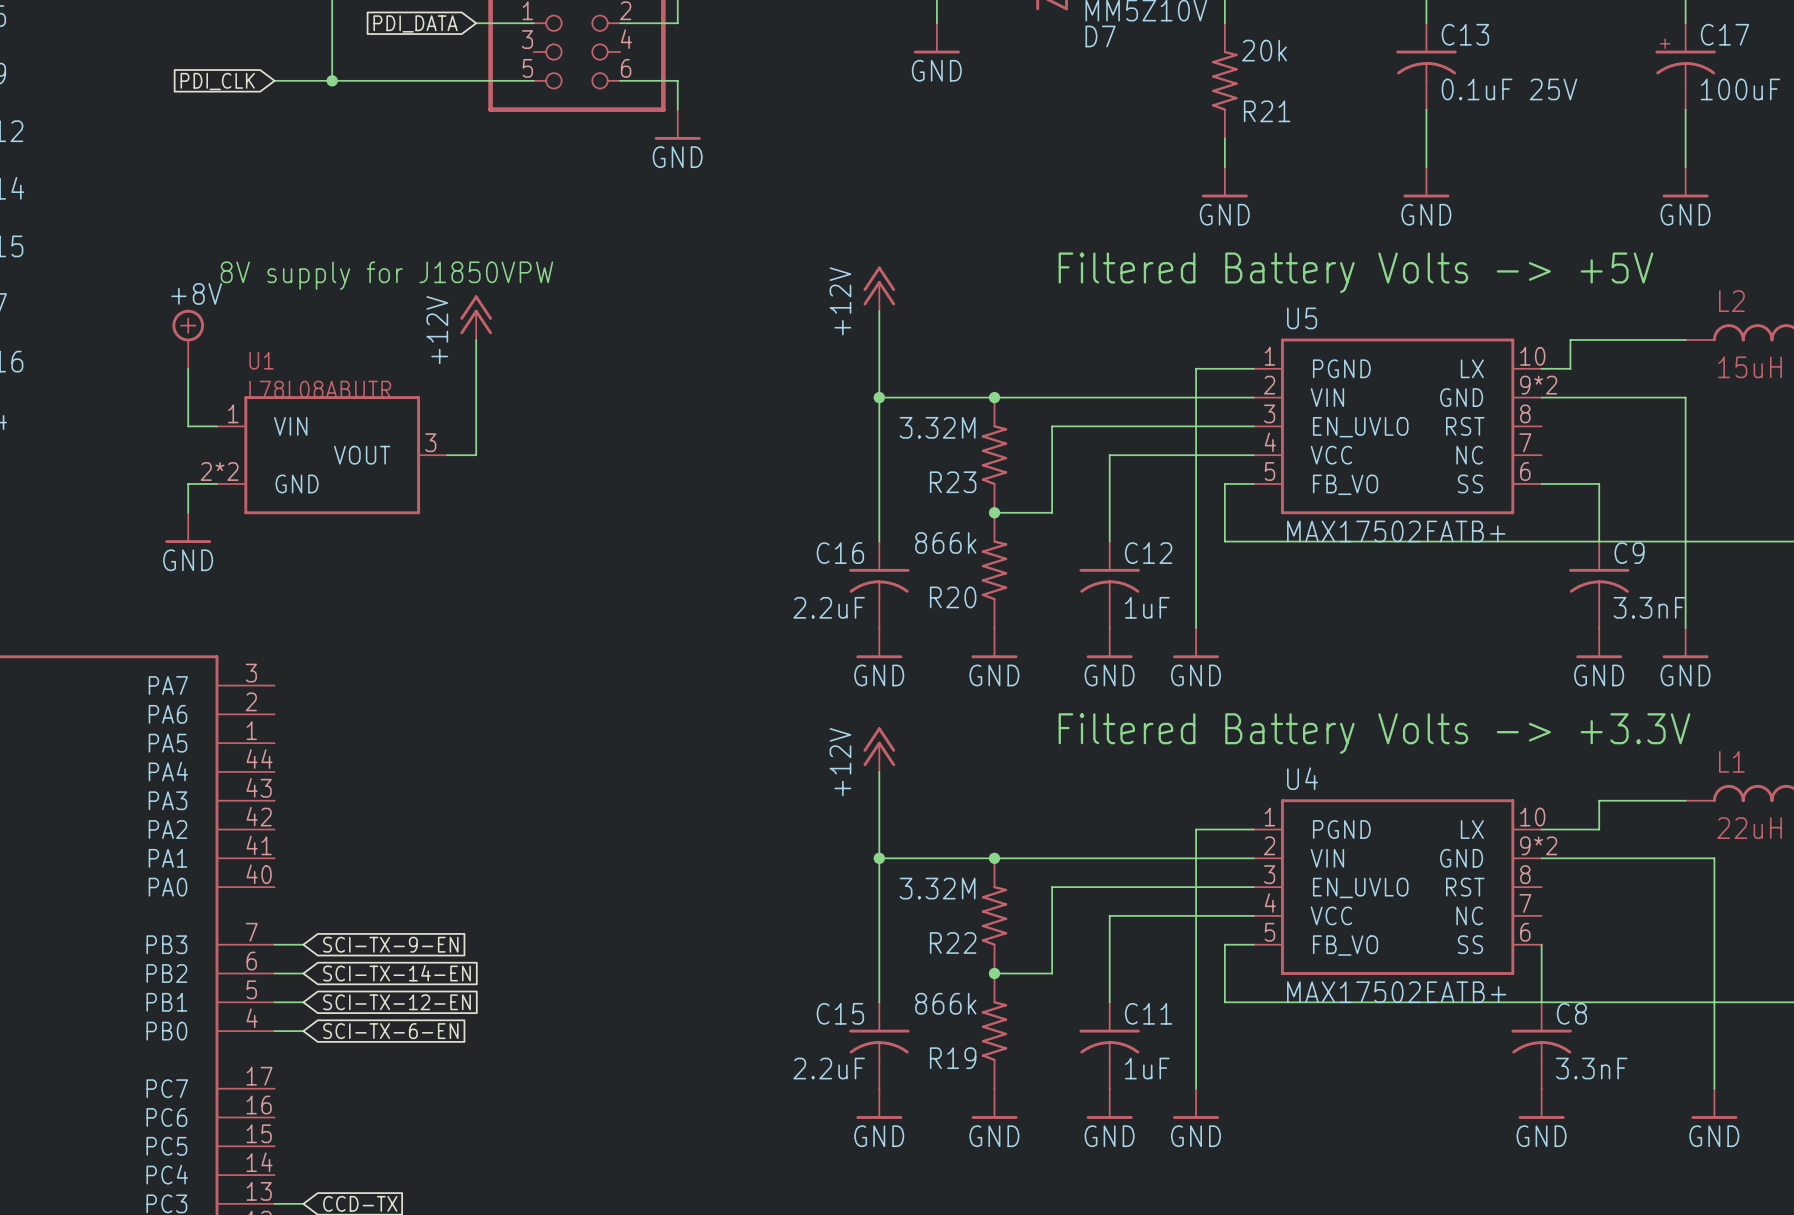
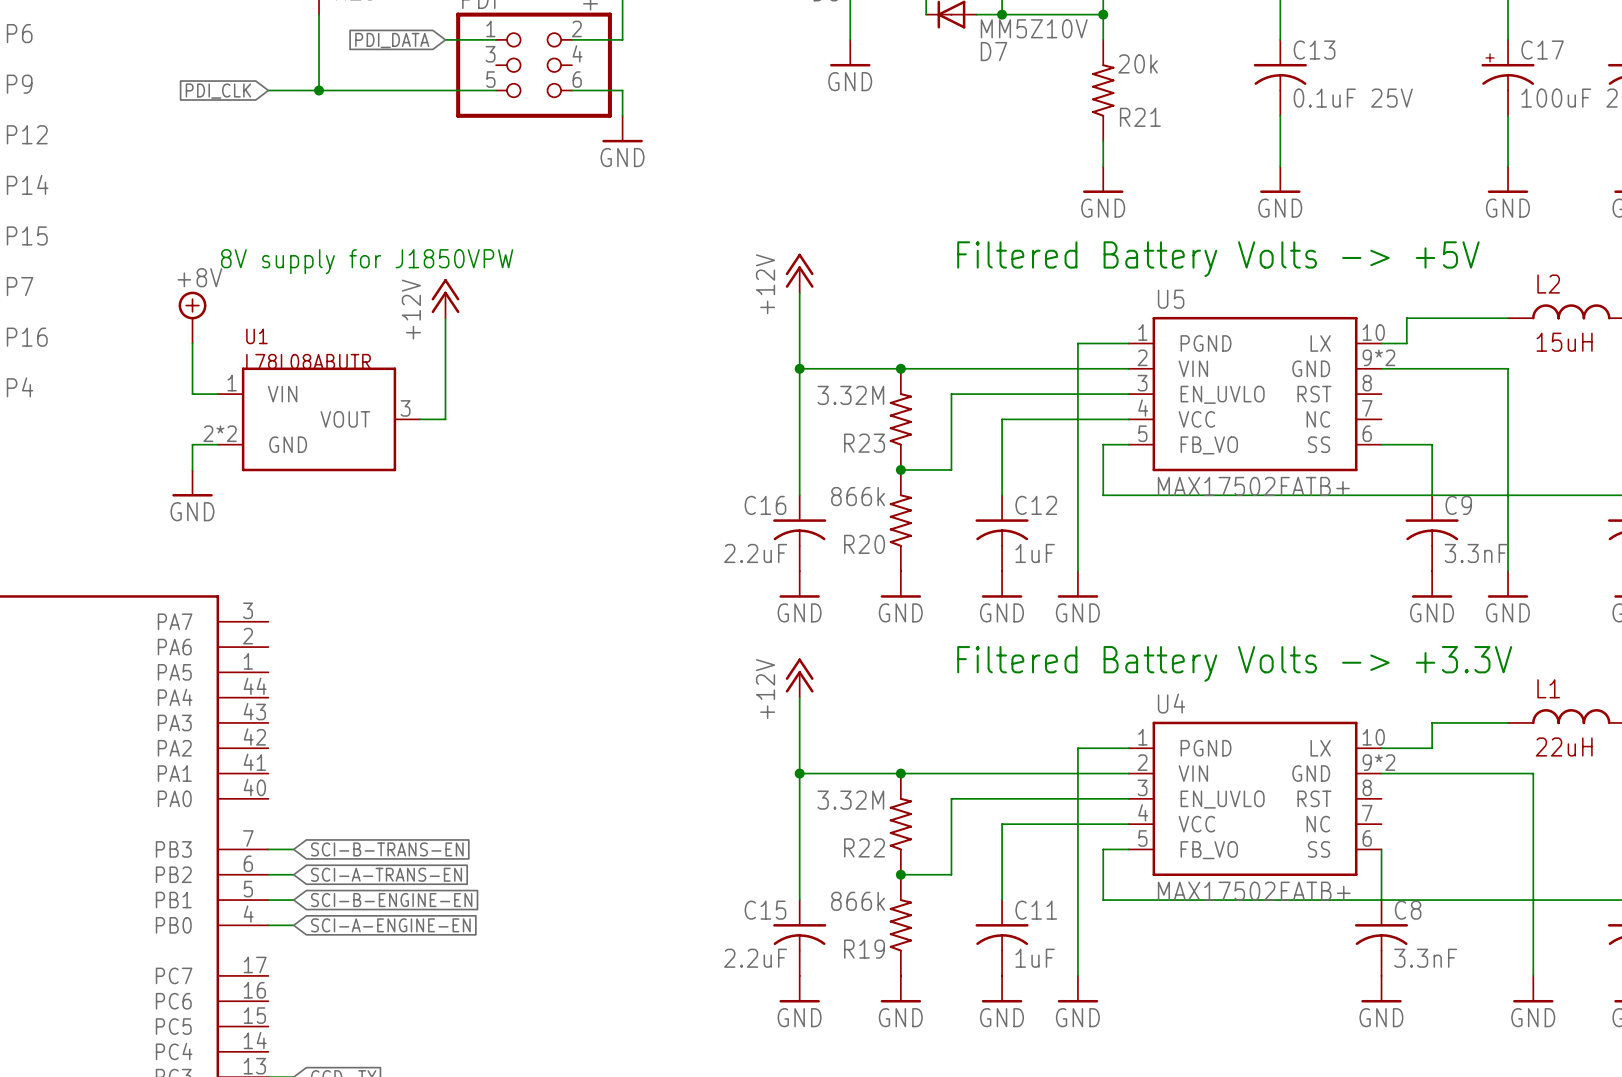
global label: SCI-TX-9-EN (390, 944) -> SCI-B-TRANS-EN (387, 849)
global label: SCI-TX-14-EN (397, 973) -> SCI-A-TRANS-EN (386, 874)
global label: SCI-TX-12-EN (397, 1002) -> SCI-B-ENGINE-EN (391, 900)
global label: SCI-TX-6-EN (390, 1031) -> SCI-A-ENGINE-EN (390, 925)

